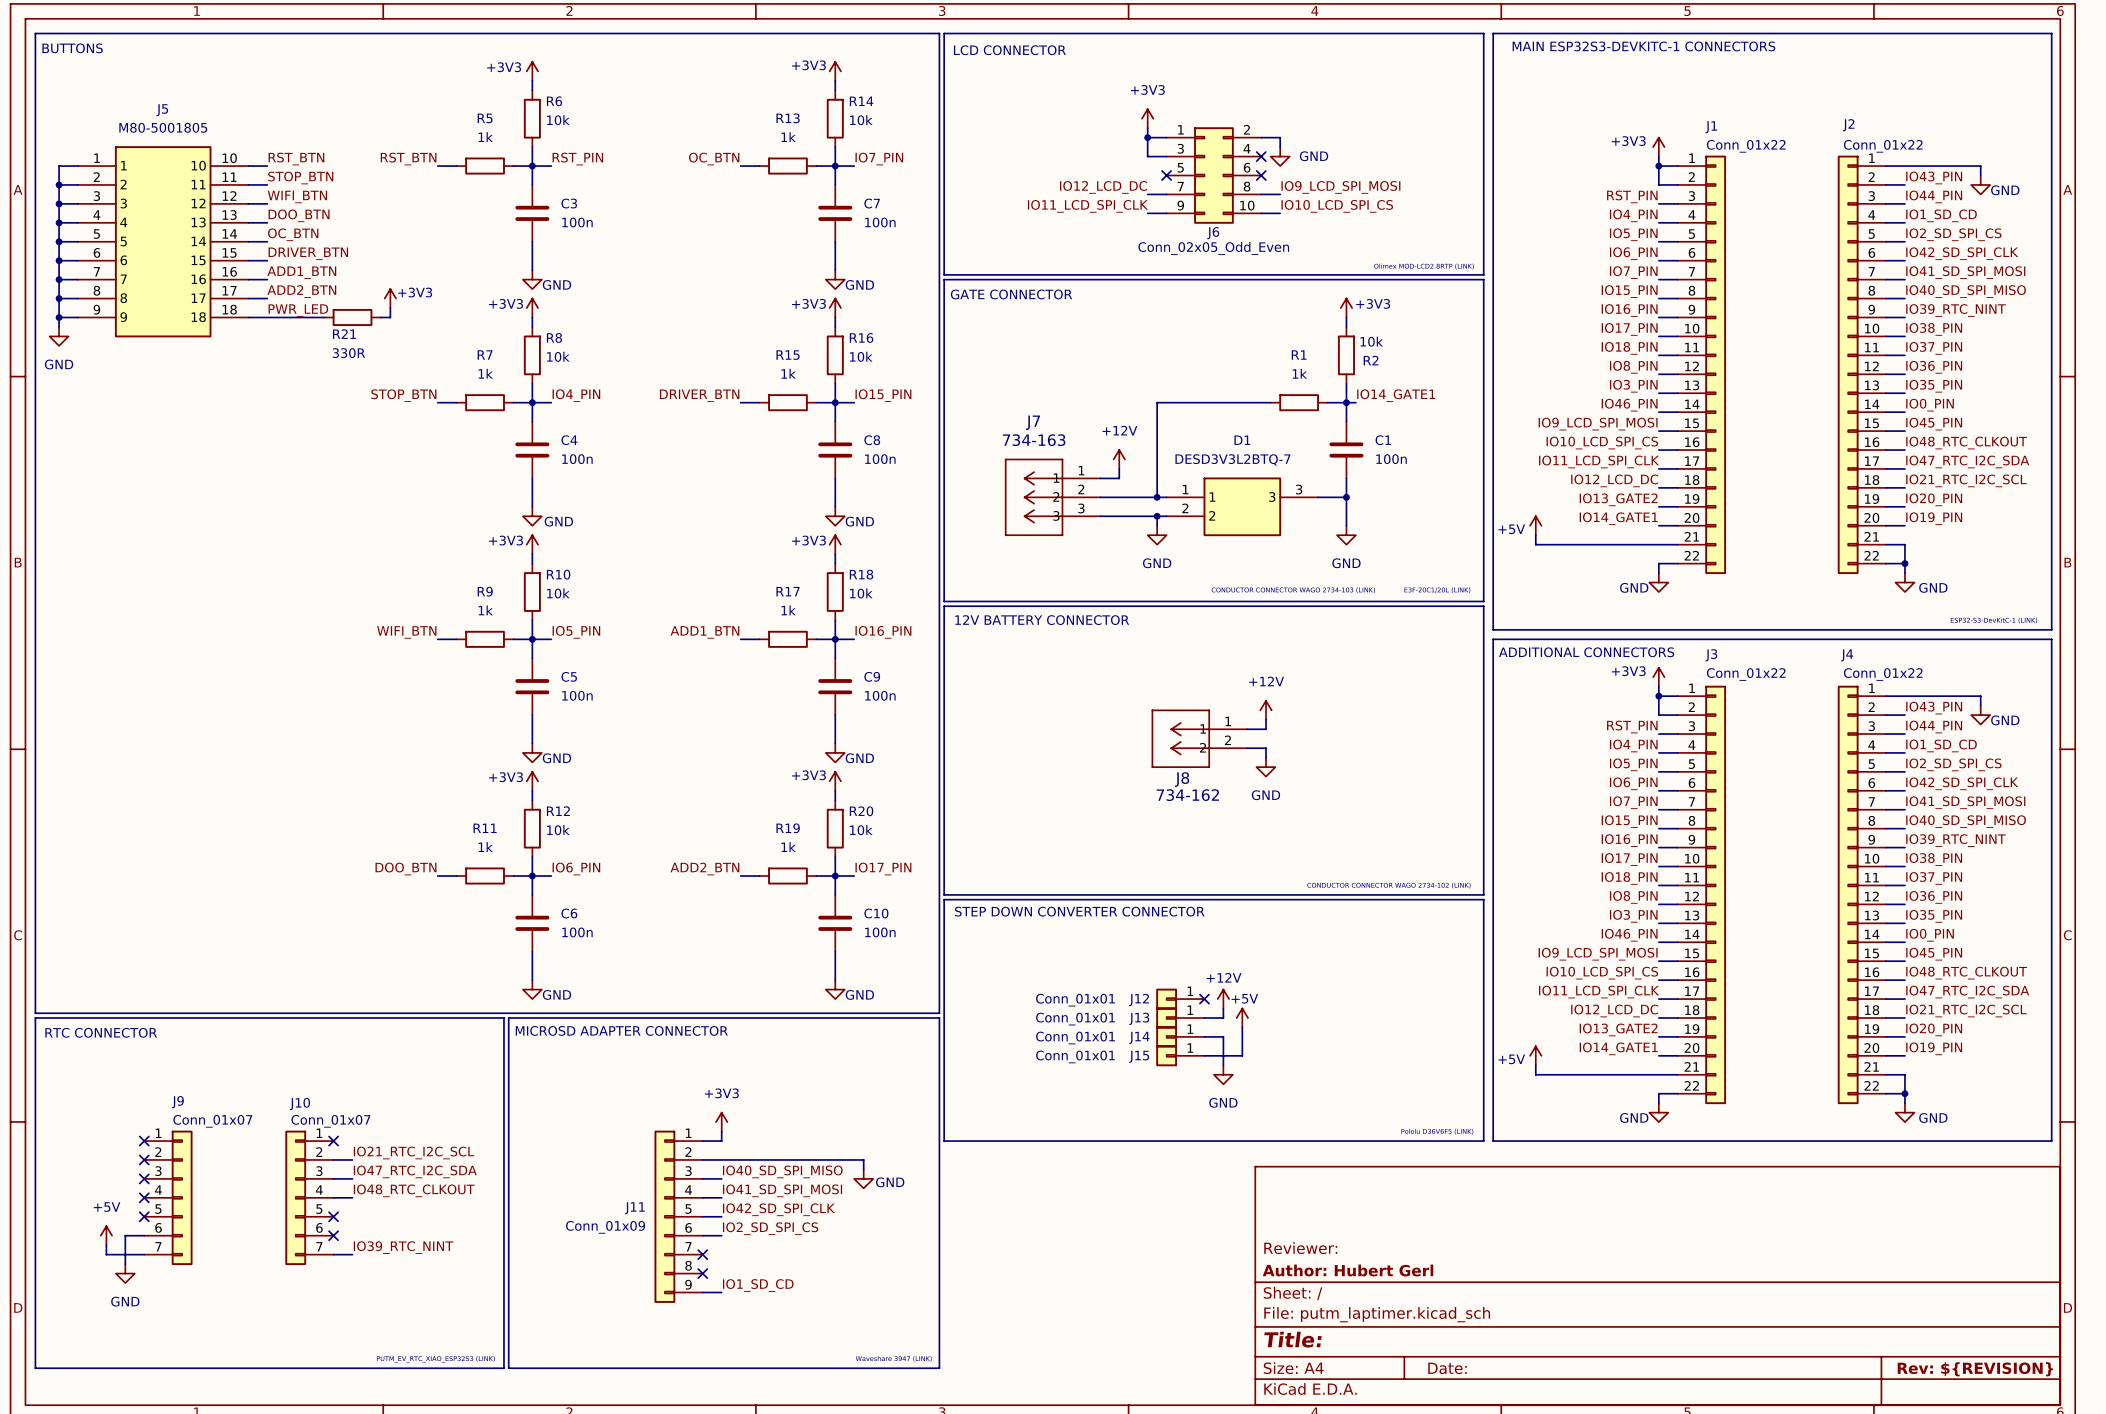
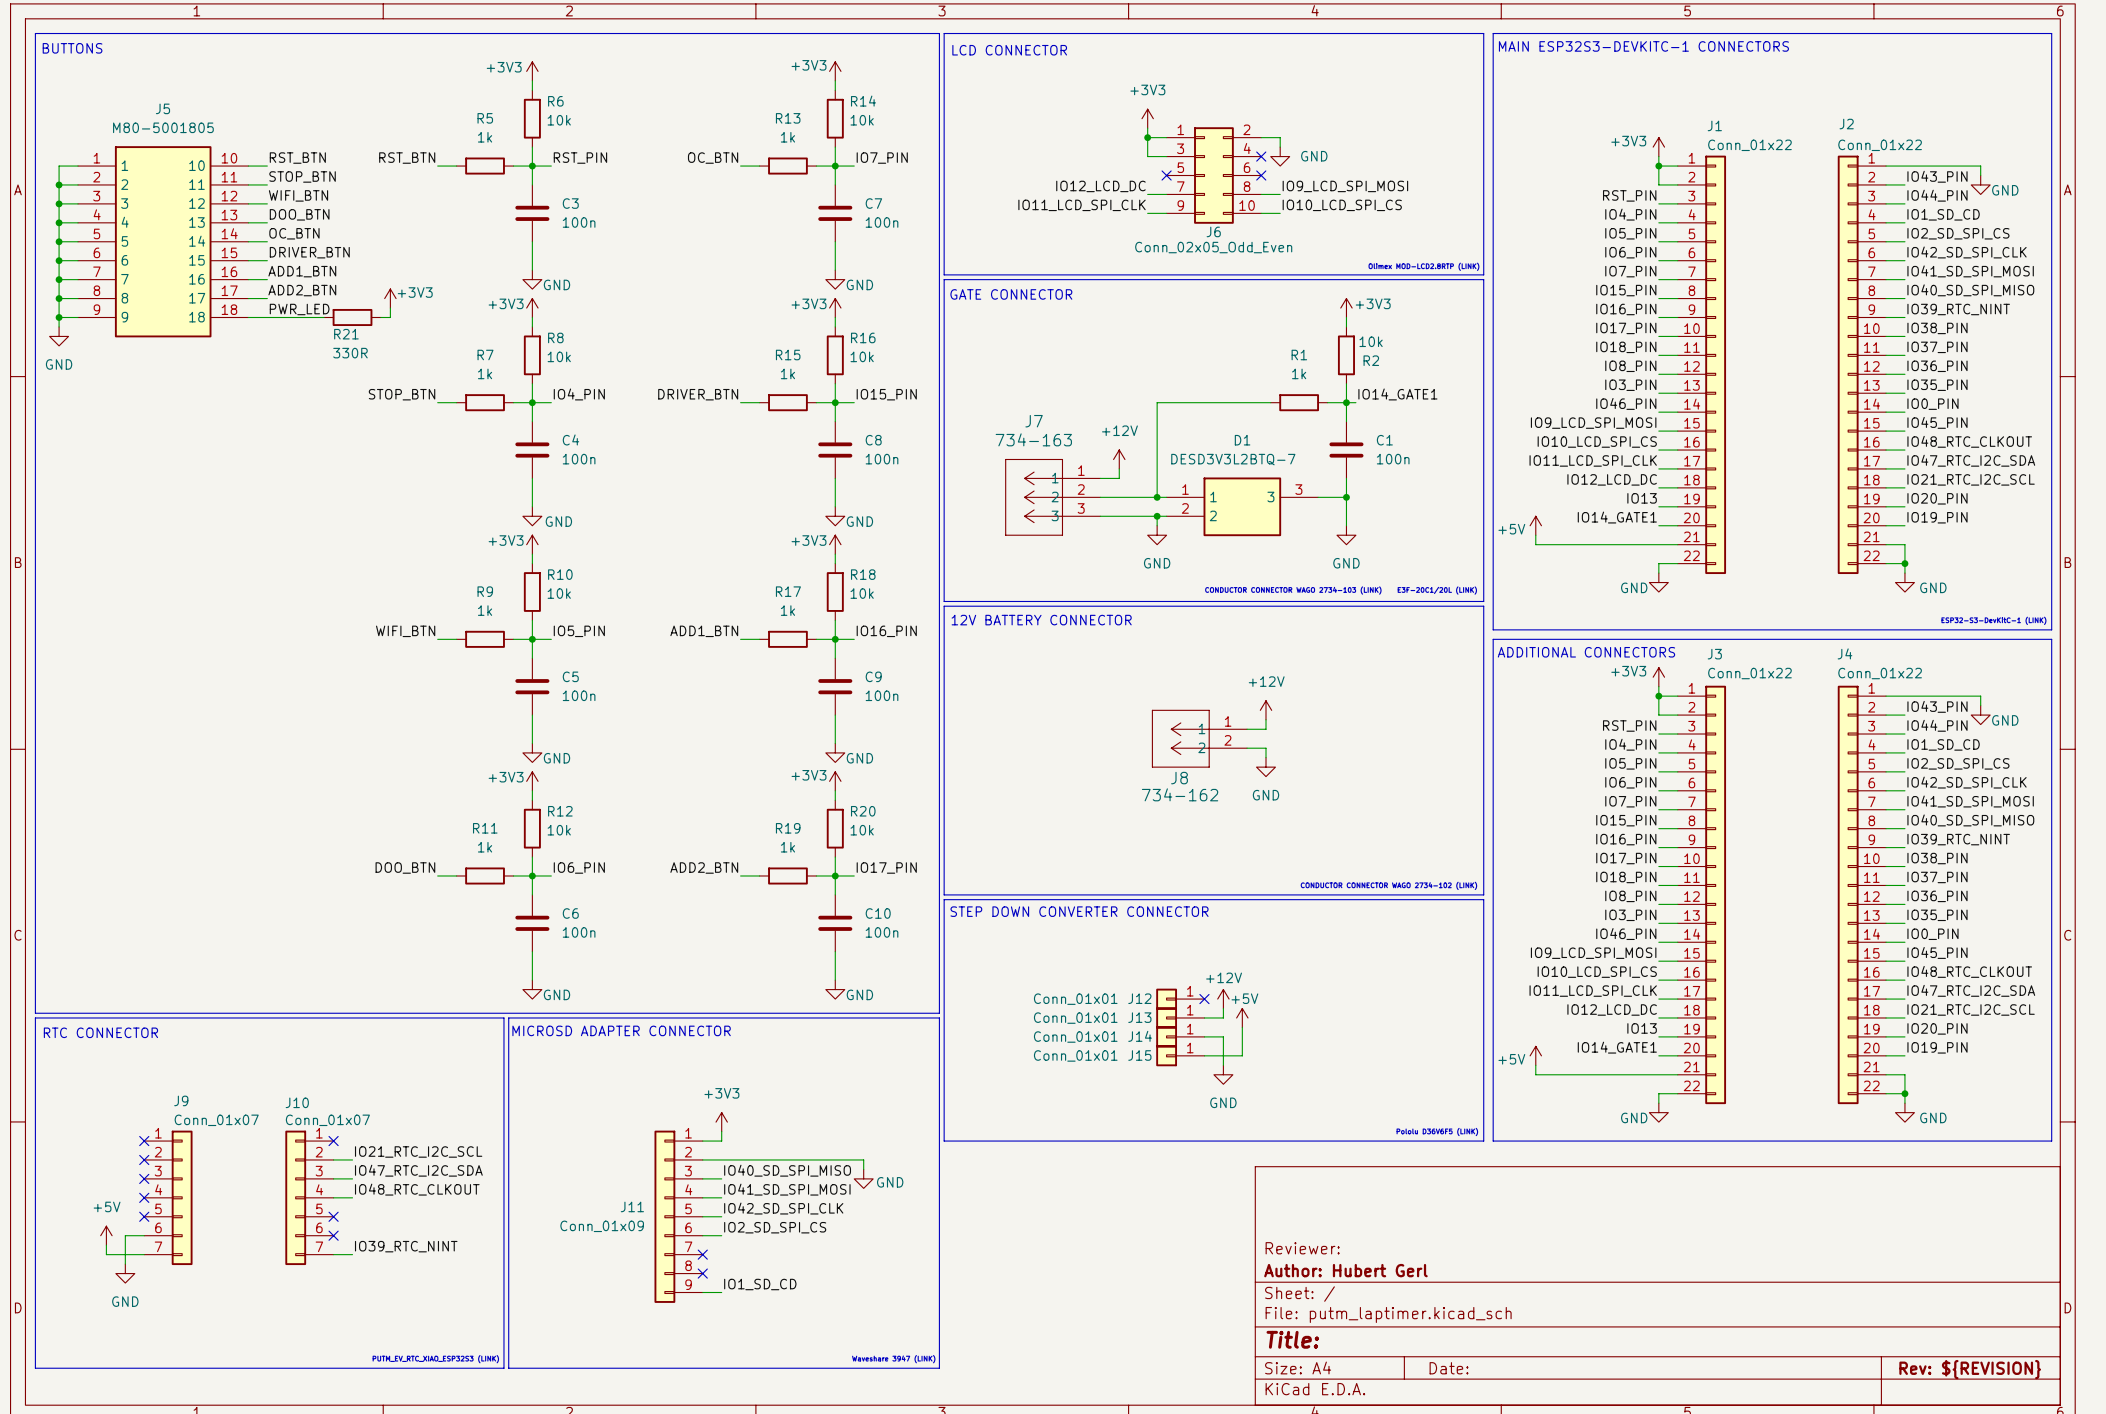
label: IO13_GATE2 (1618, 499) -> IO13 (1642, 498)
label: IO13_GATE2 (1618, 1029) -> IO13 (1642, 1028)

